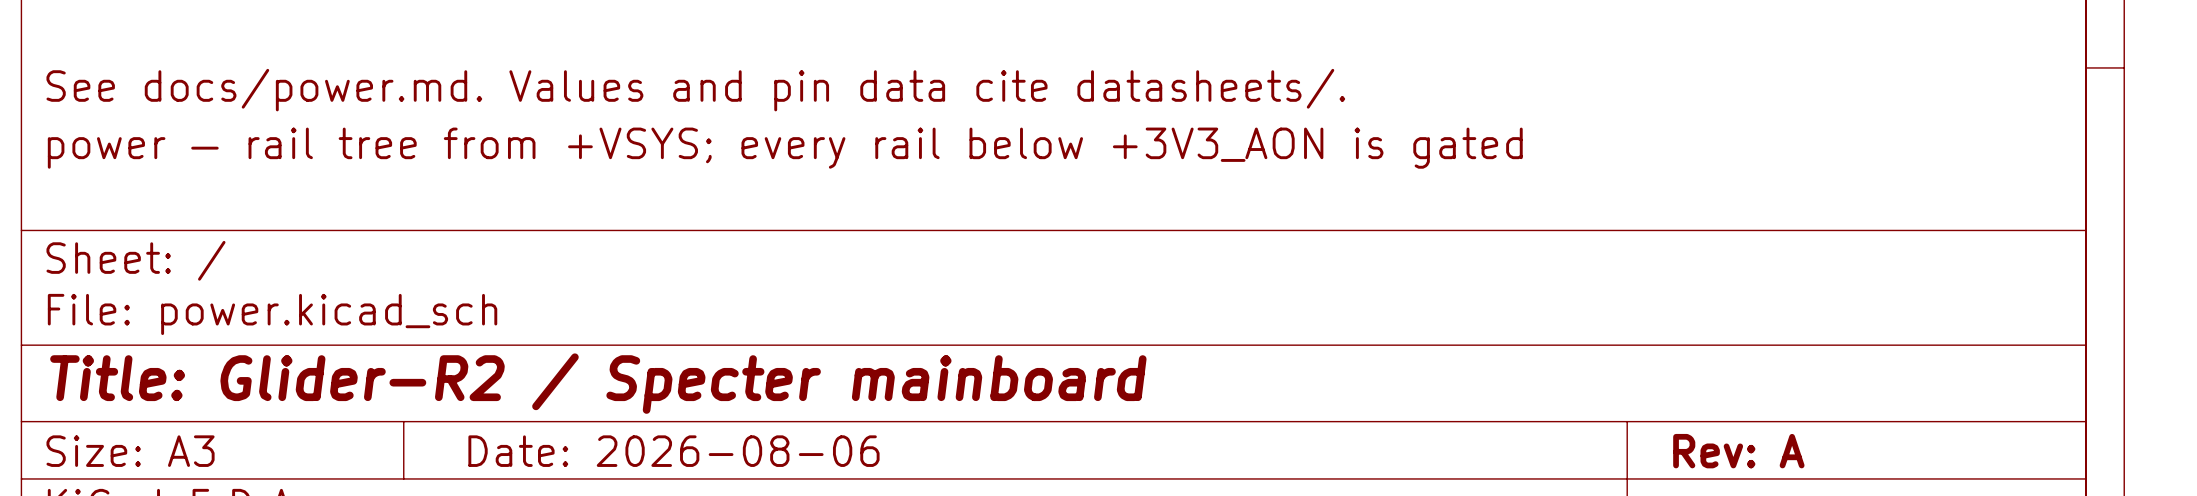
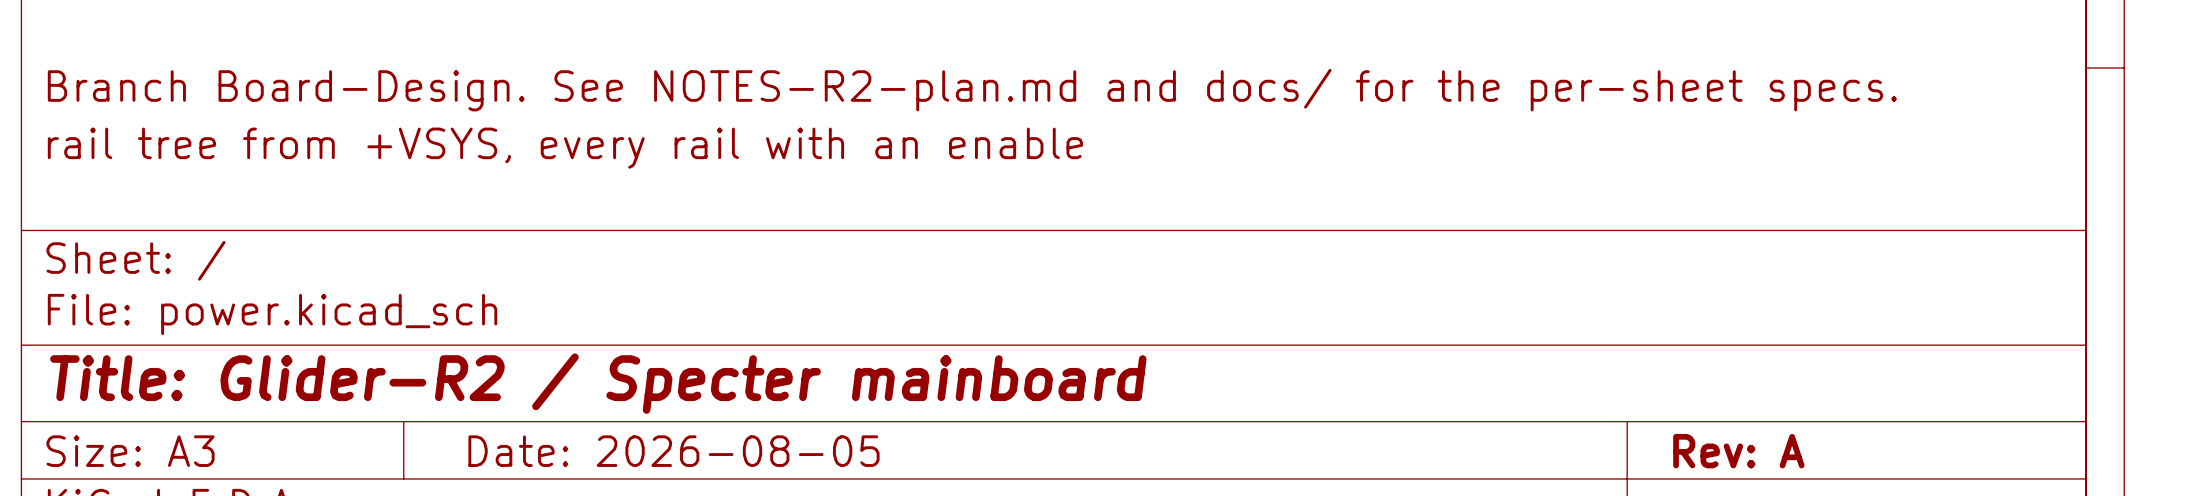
title block: See docs/power.md. Values and pin data cite datasheets/. (695, 90) -> Branch Board-Design. See NOTES-R2-plan.md and docs/ for the per-sheet specs. (972, 90)
title block: power — rail tree from +VSYS; every rail below +3V3_AON is gated (785, 148) -> rail tree from +VSYS, every rail with an enable (565, 148)
title block: Date: 2026-08-06 (673, 451) -> Date: 2026-08-05 (673, 451)

